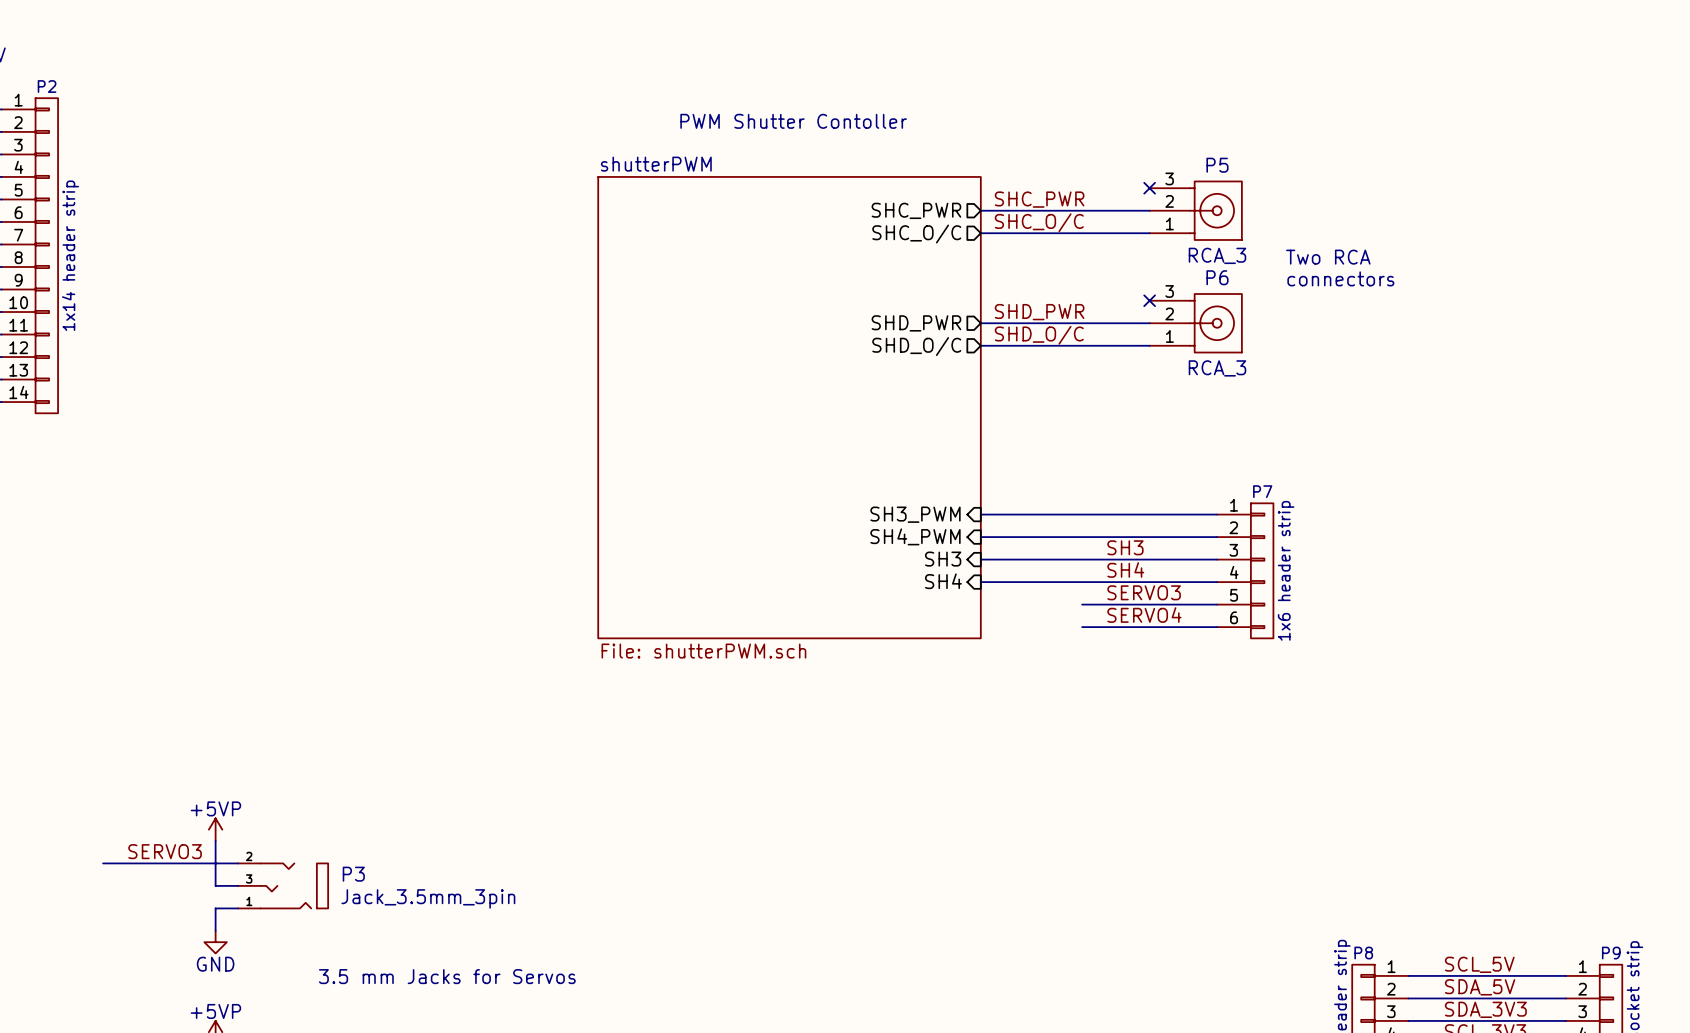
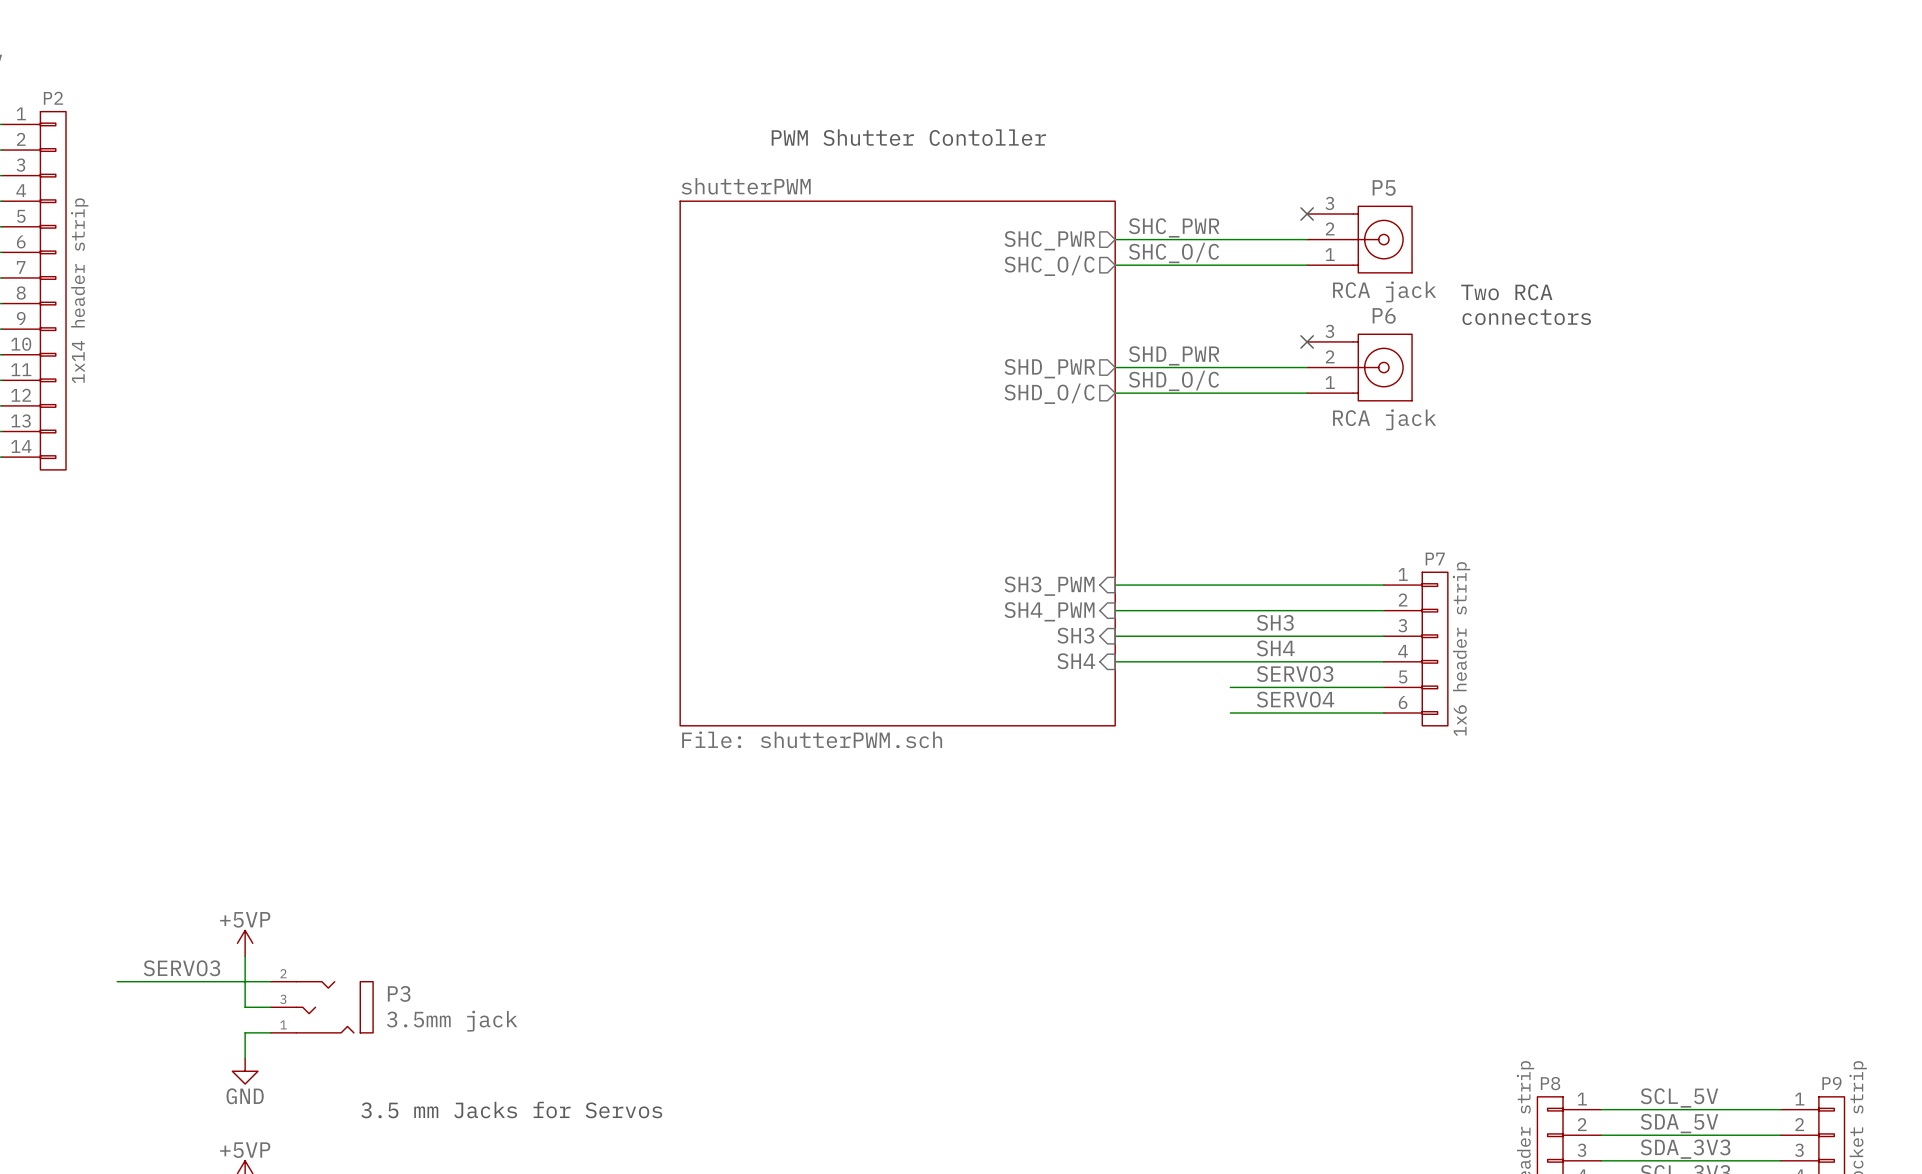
P5 value: RCA_3 (1217, 255) -> RCA jack (1384, 291)
P6 value: RCA_3 (1217, 368) -> RCA jack (1384, 419)
P3 value: Jack_3.5mm_3pin (428, 898) -> 3.5mm jack (452, 1021)

